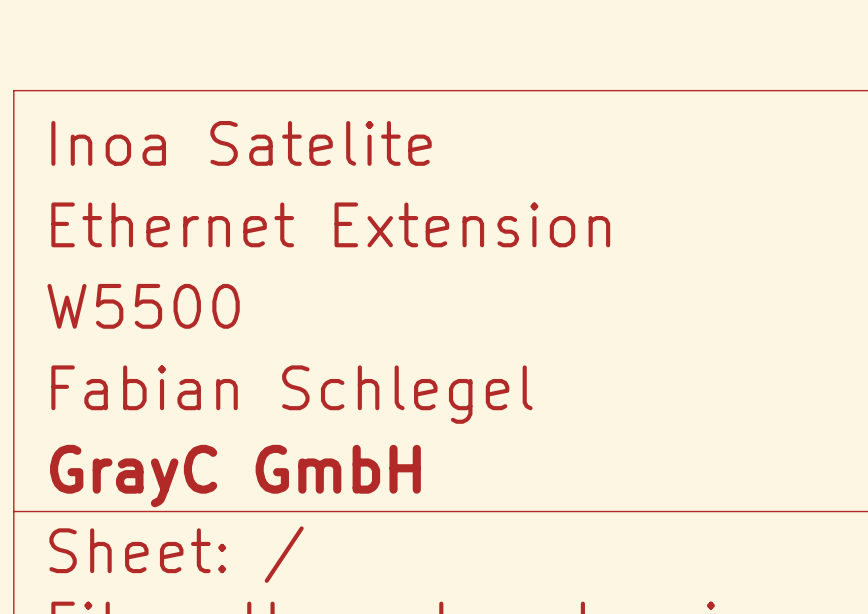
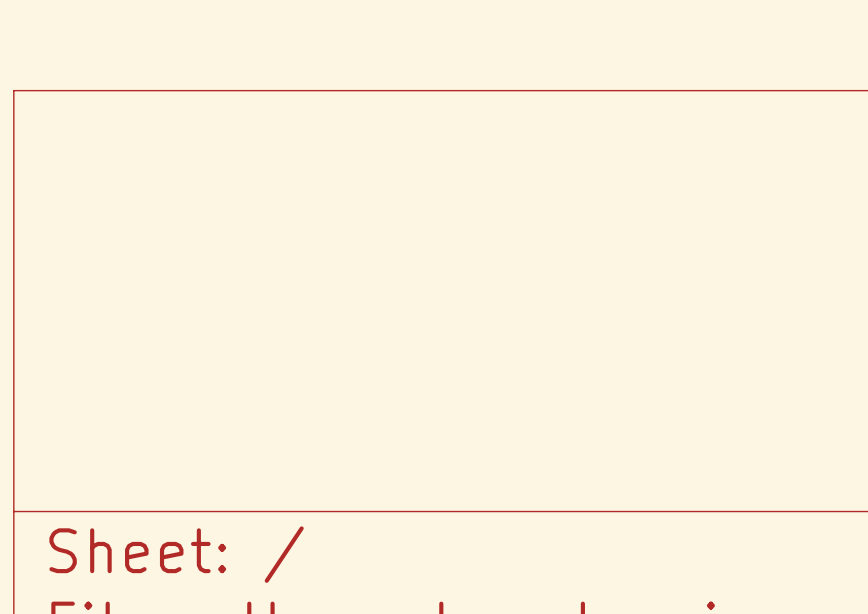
title block: Inoa Satelite (241, 143) -> none
title block: Ethernet Extension (330, 224) -> none
title block: W5500 (143, 306) -> none
title block: Fabian Schlegel (291, 394) -> none
title block: GrayC GmbH (235, 476) -> none

